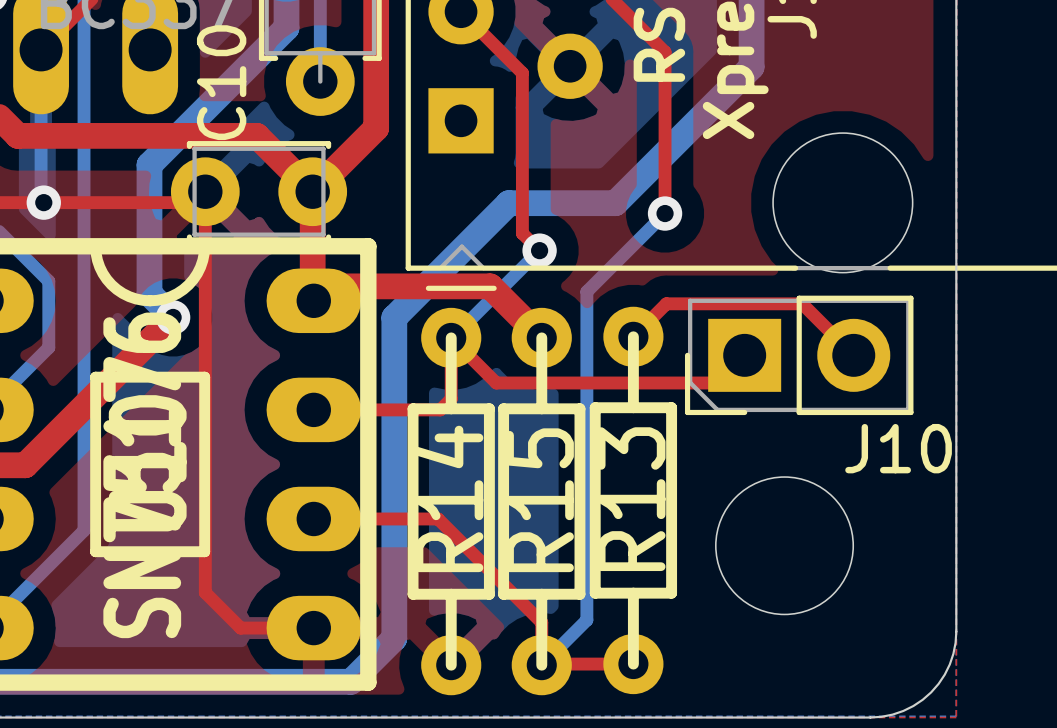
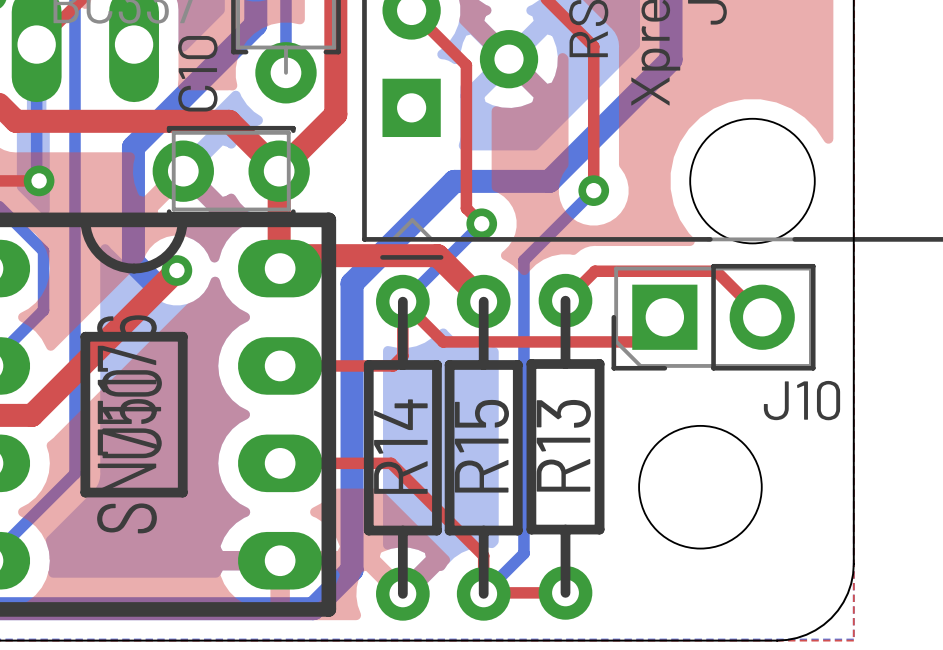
top track: (43, 202) (194, 202) (205, 191) (205, 592) (240, 628) (313, 628) -> none
top track: (173, 317) (25, 465) -> (176, 270) (32, 415) (22, 415)
via position: (173, 317) -> (176, 270)

